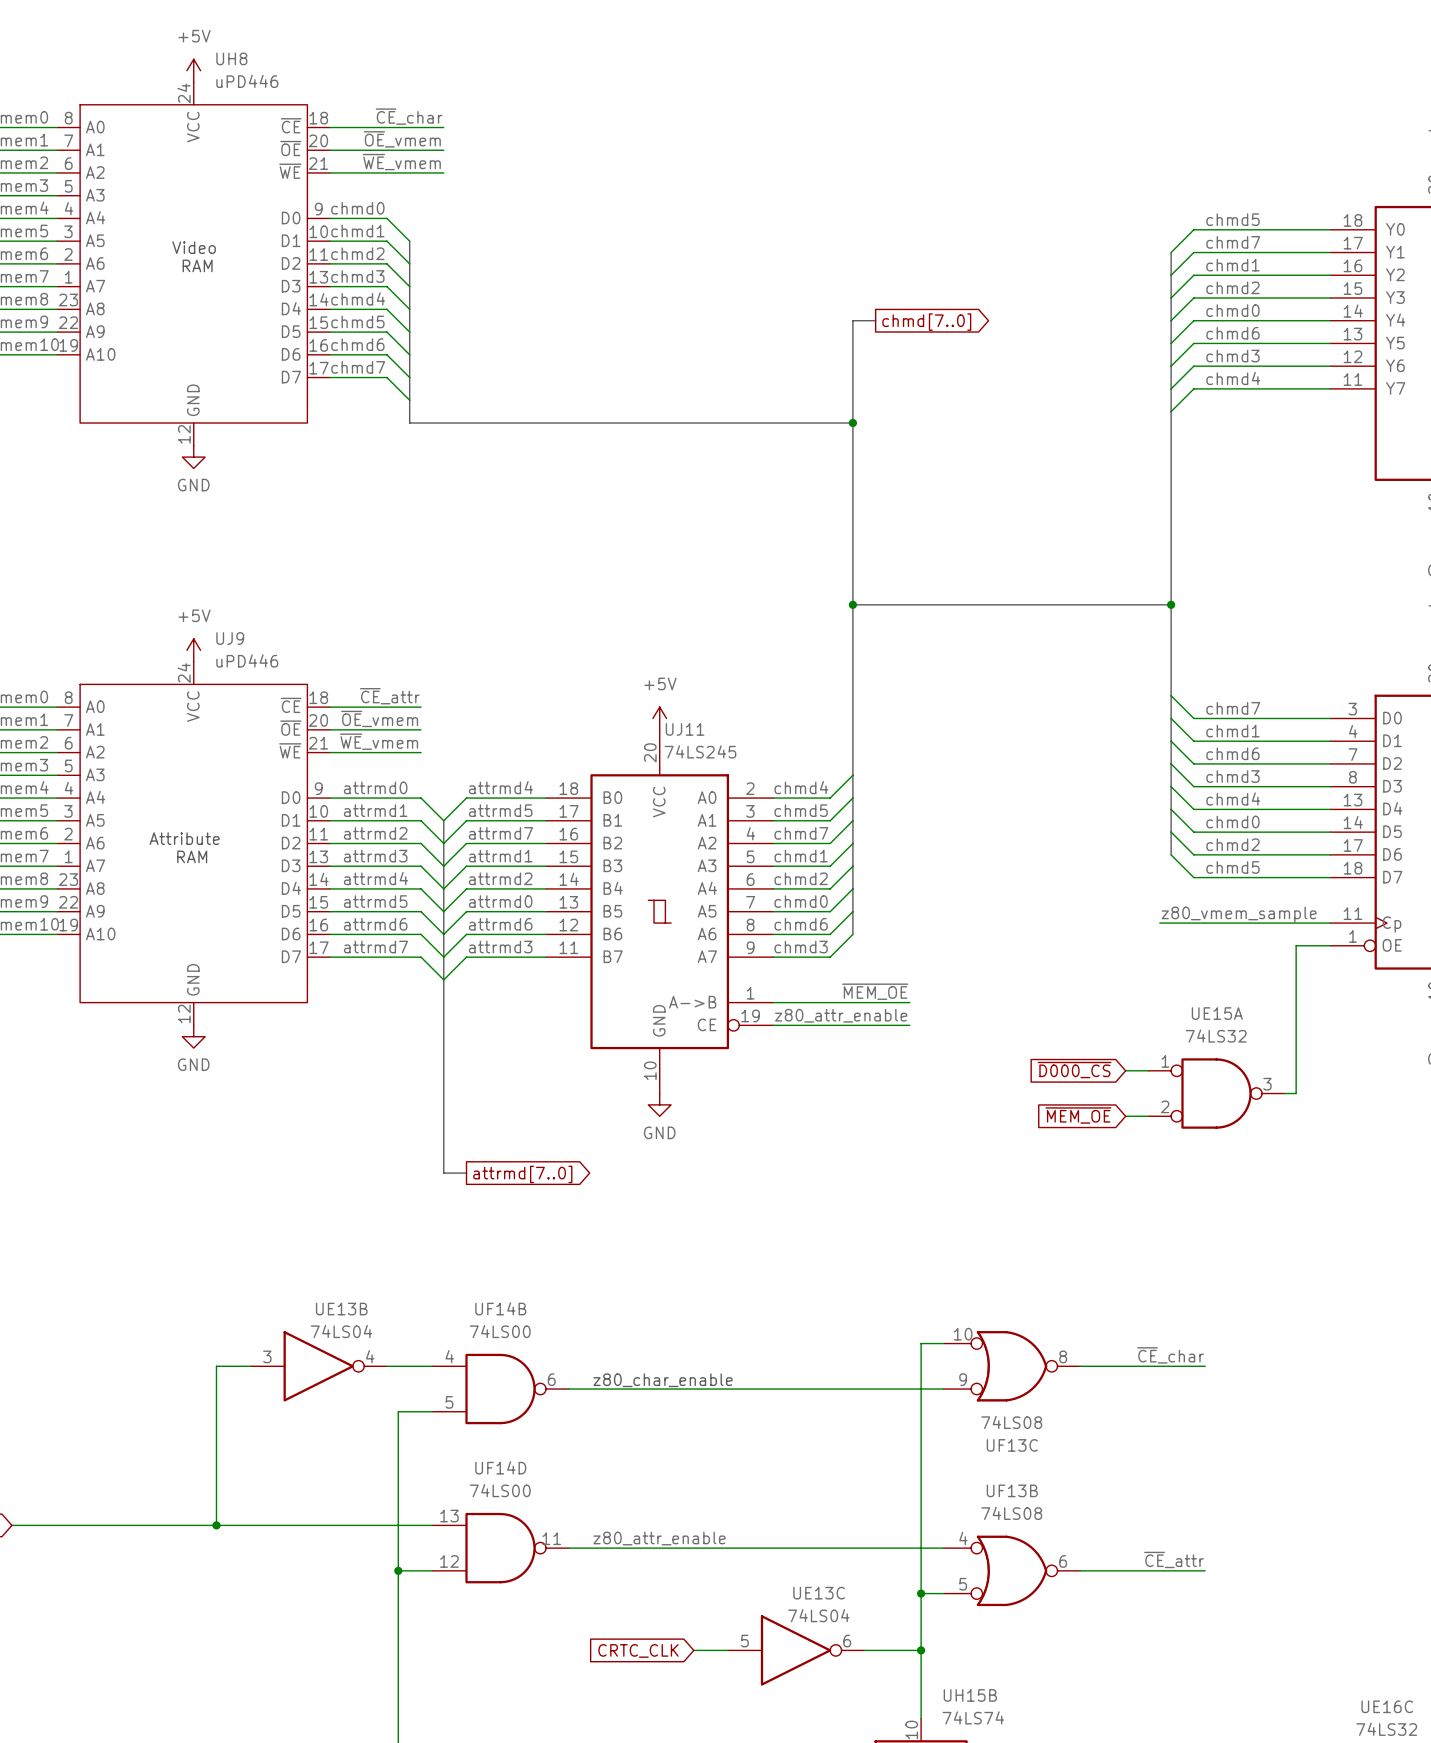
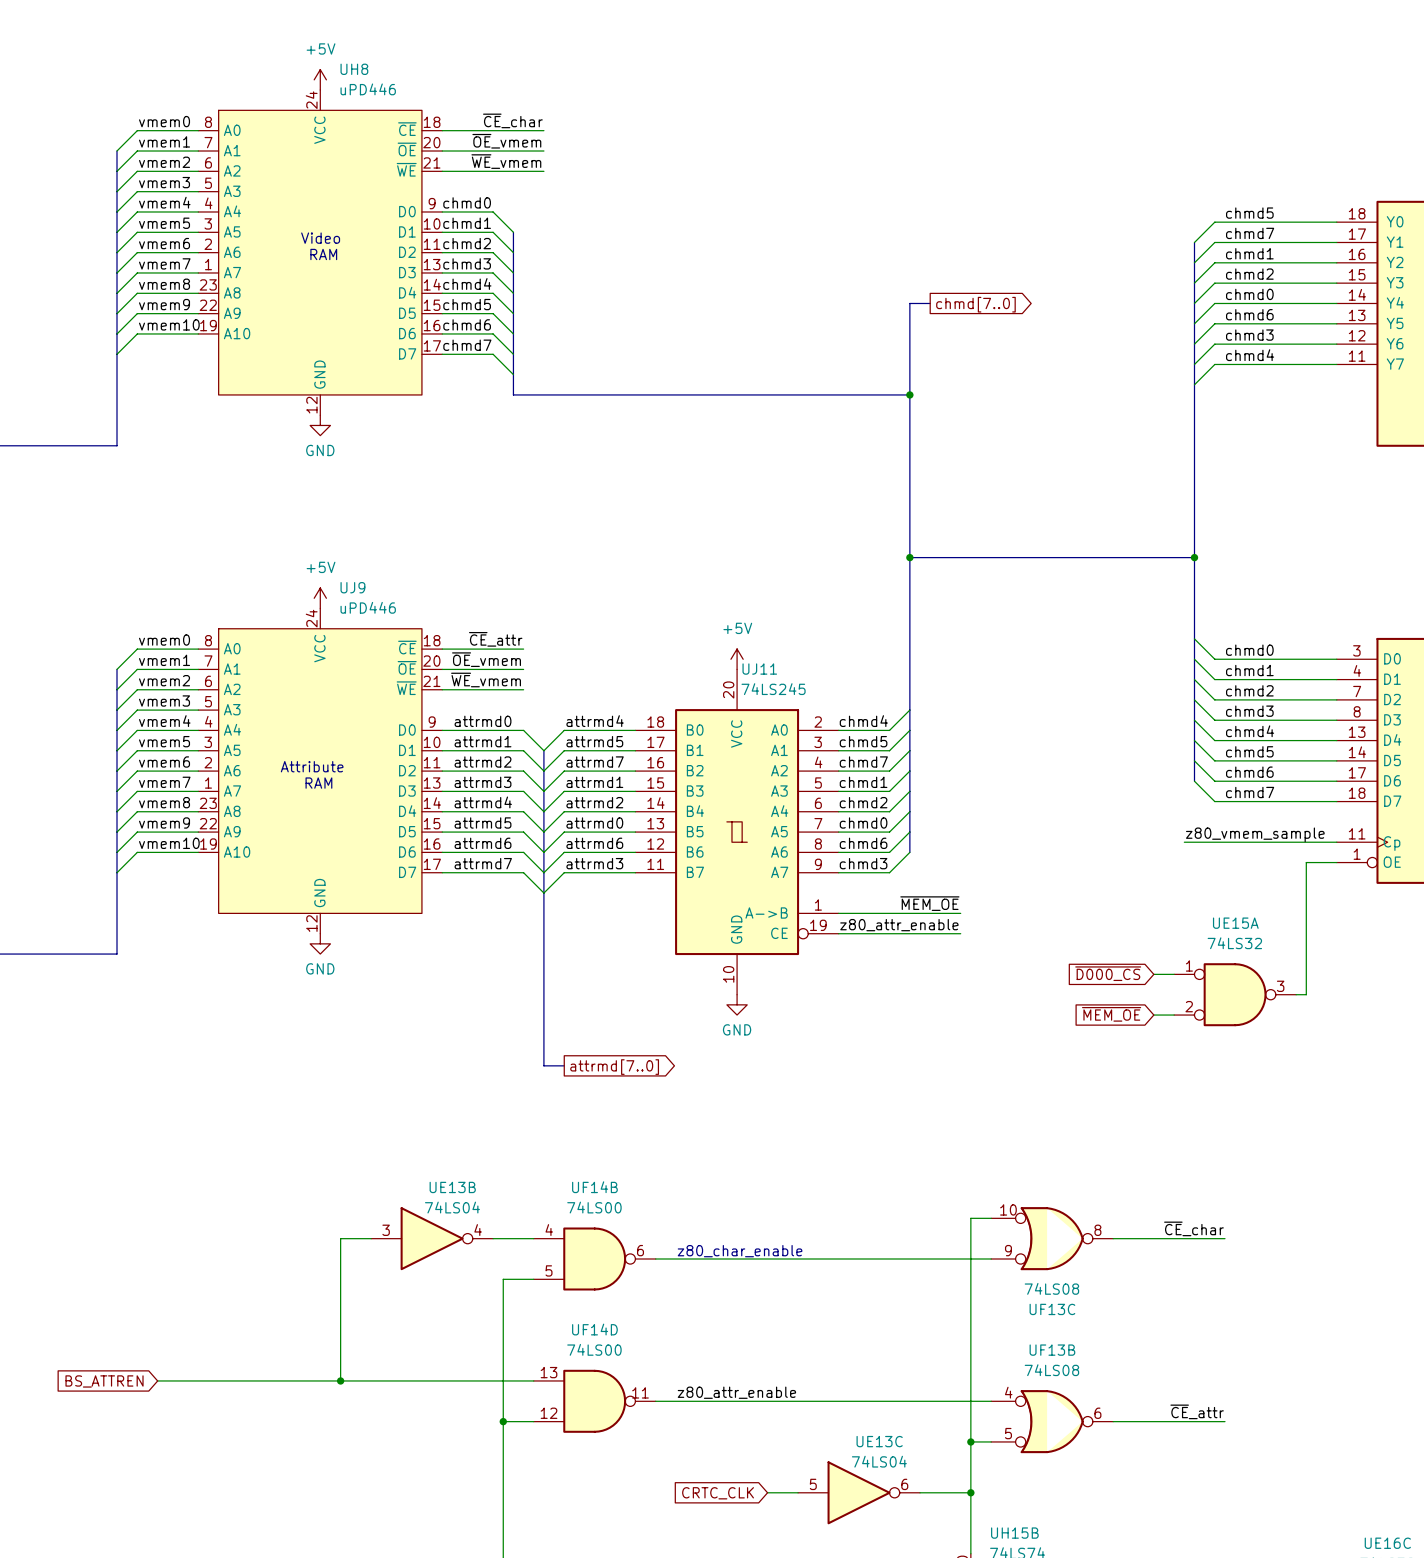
label: chmd7 (1233, 708) -> chmd0 (1249, 650)
label: chmd6 (1233, 753) -> chmd2 (1249, 690)
label: chmd0 (1233, 821) -> chmd5 (1249, 751)
label: chmd2 (1233, 844) -> chmd6 (1249, 772)
label: chmd5 (1233, 867) -> chmd7 (1250, 792)

